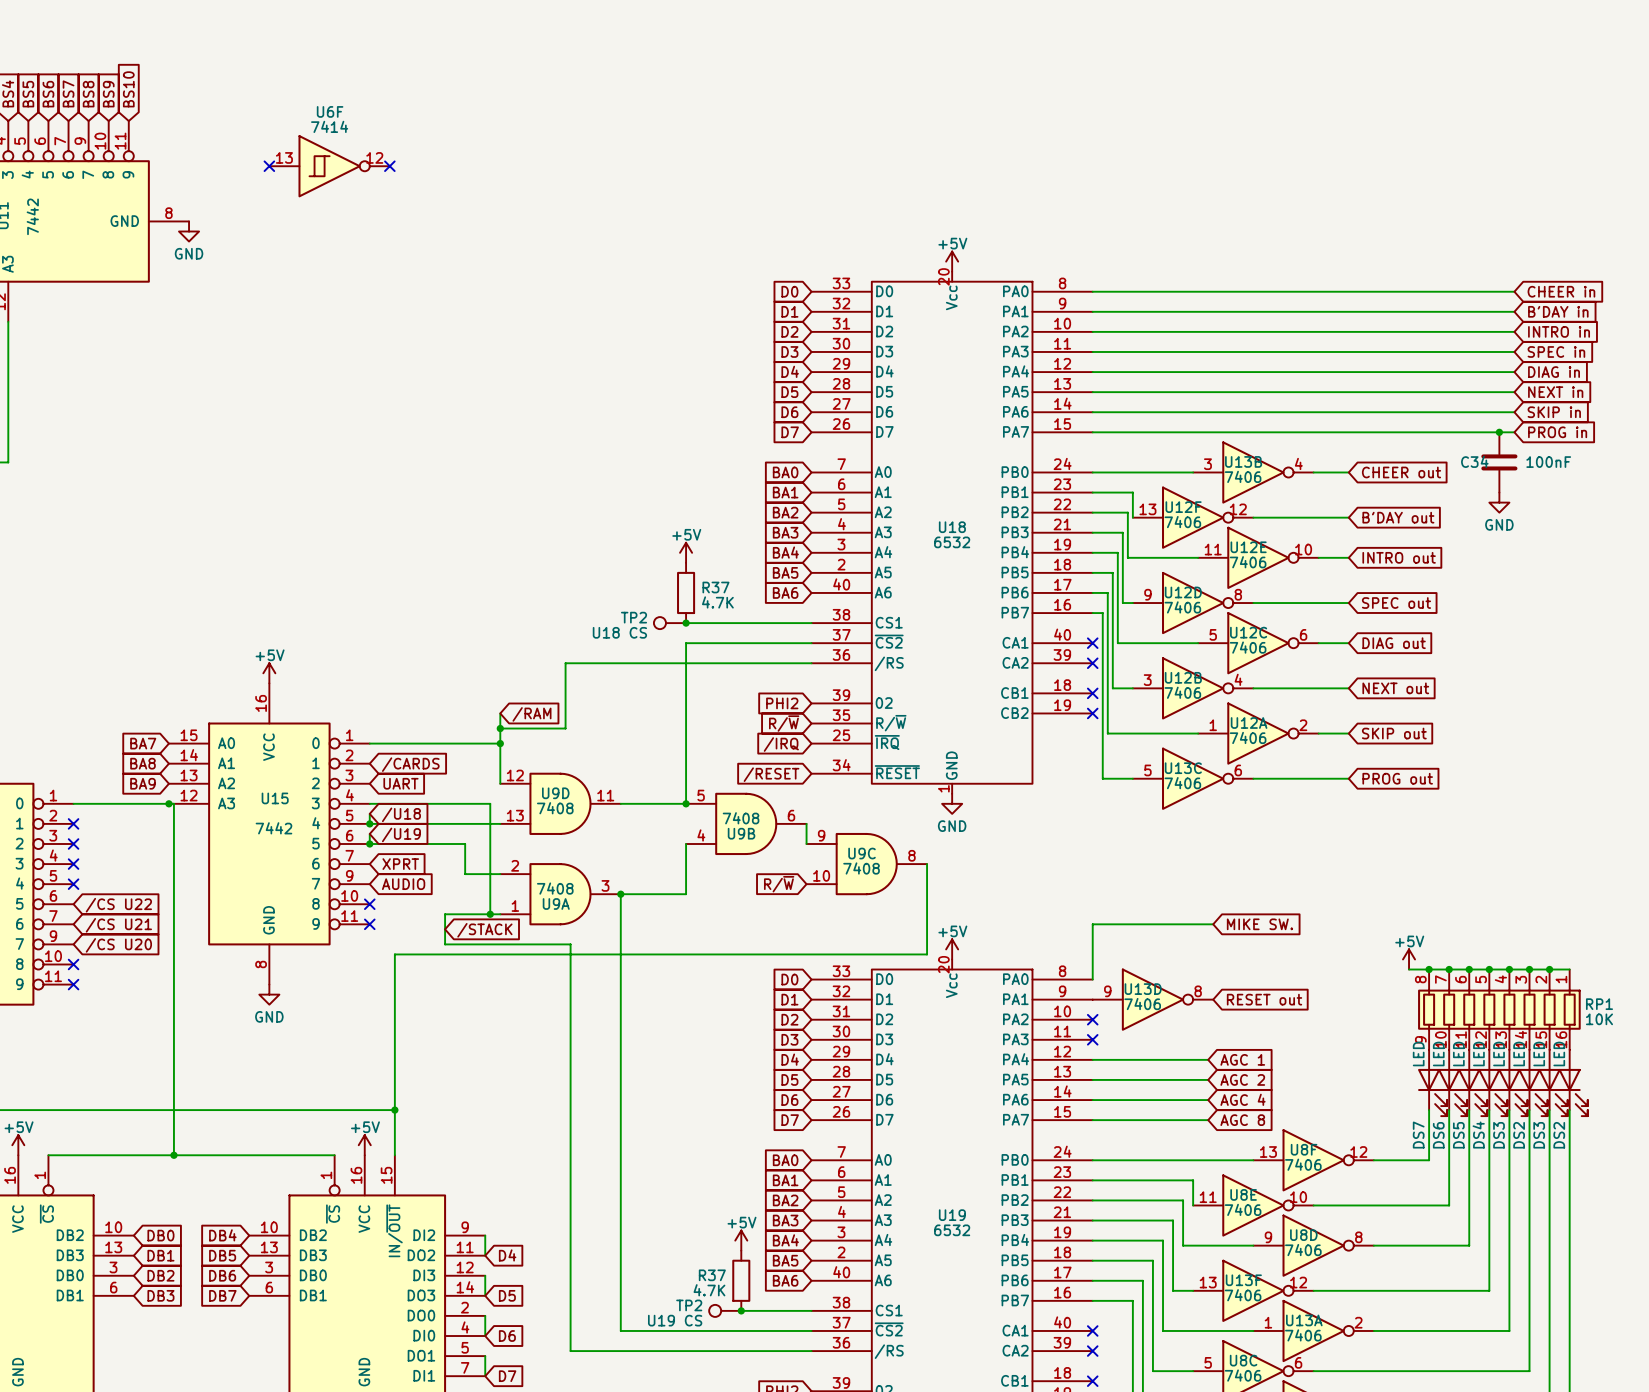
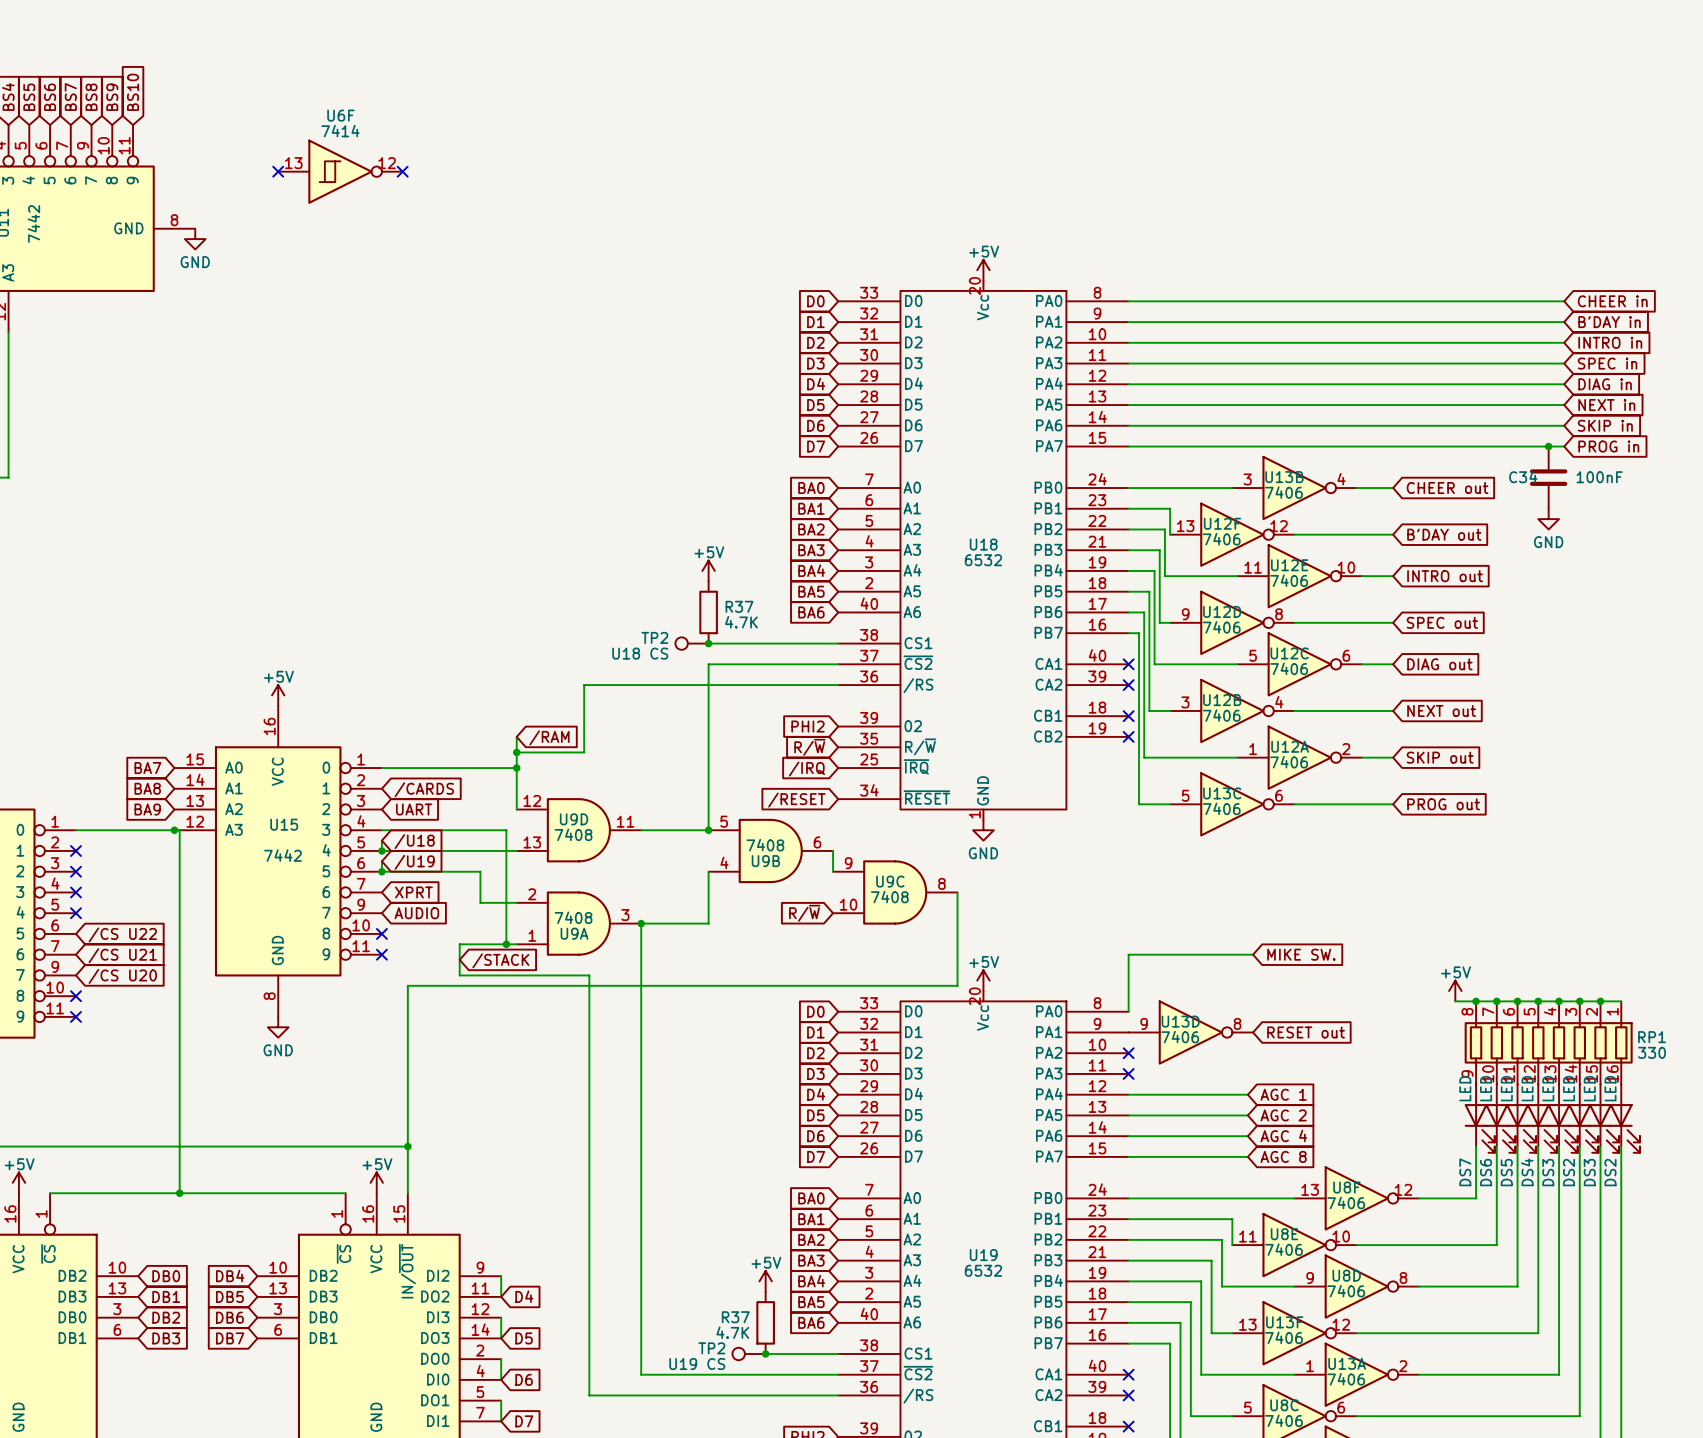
RP1 value: 10K (1599, 1019) -> 330 (1652, 1052)

